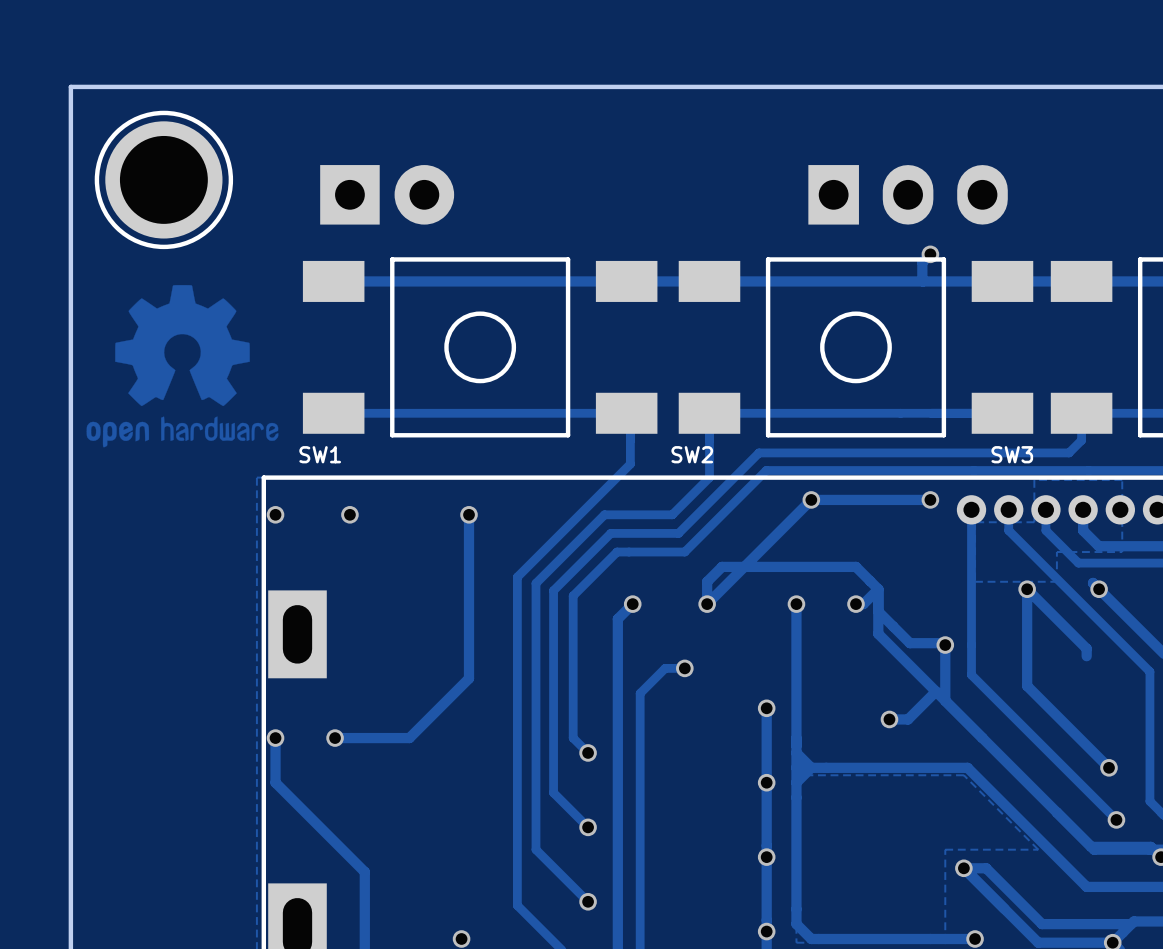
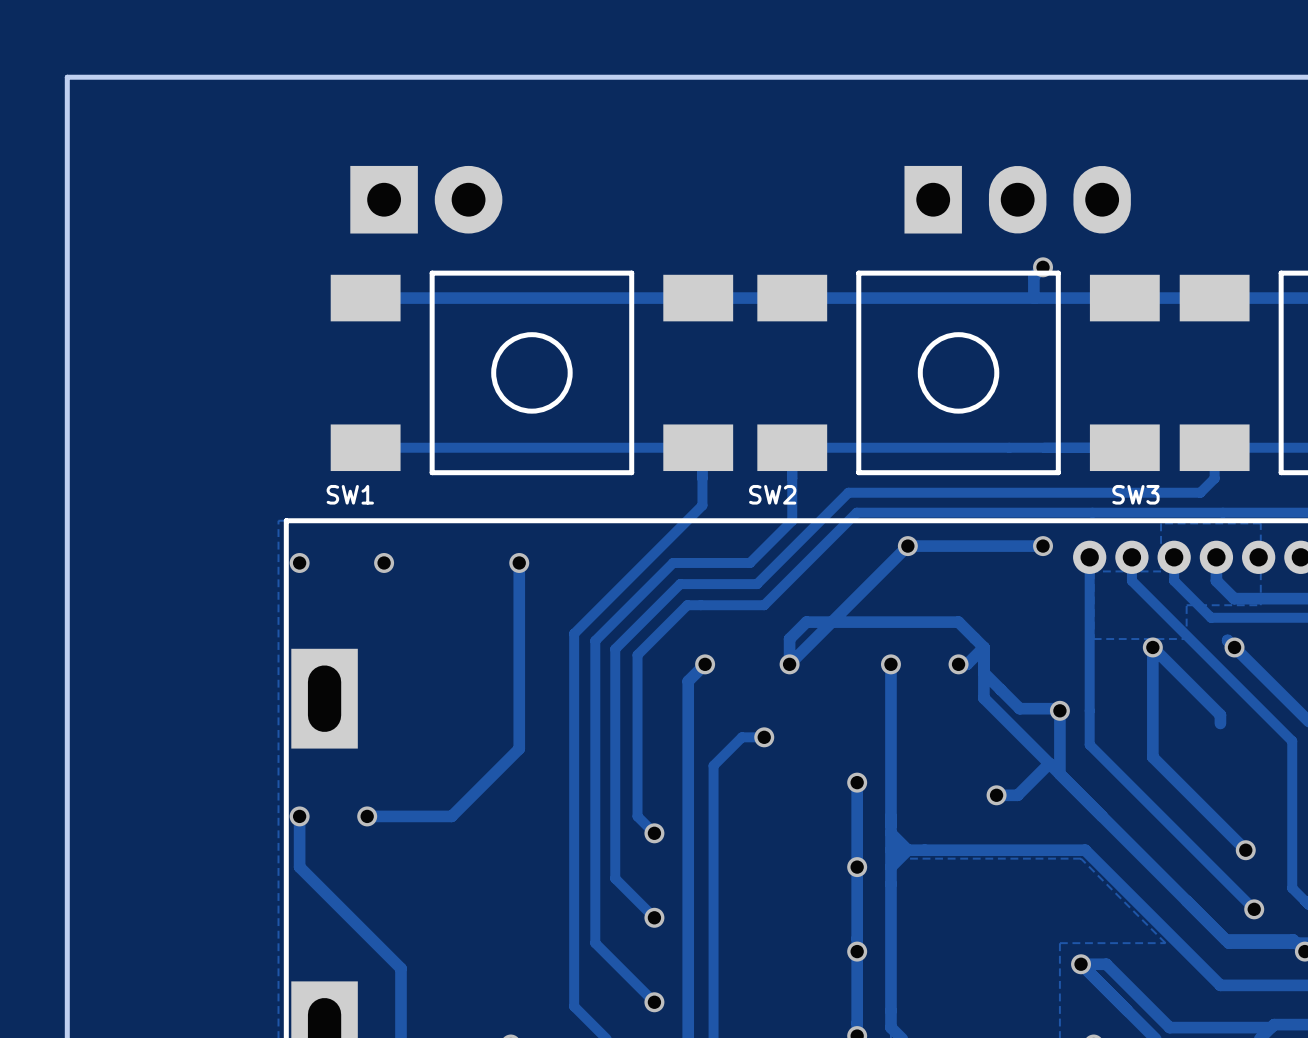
part: (163, 179) -> none
drawing: [86, 285, 279, 448] -> none

